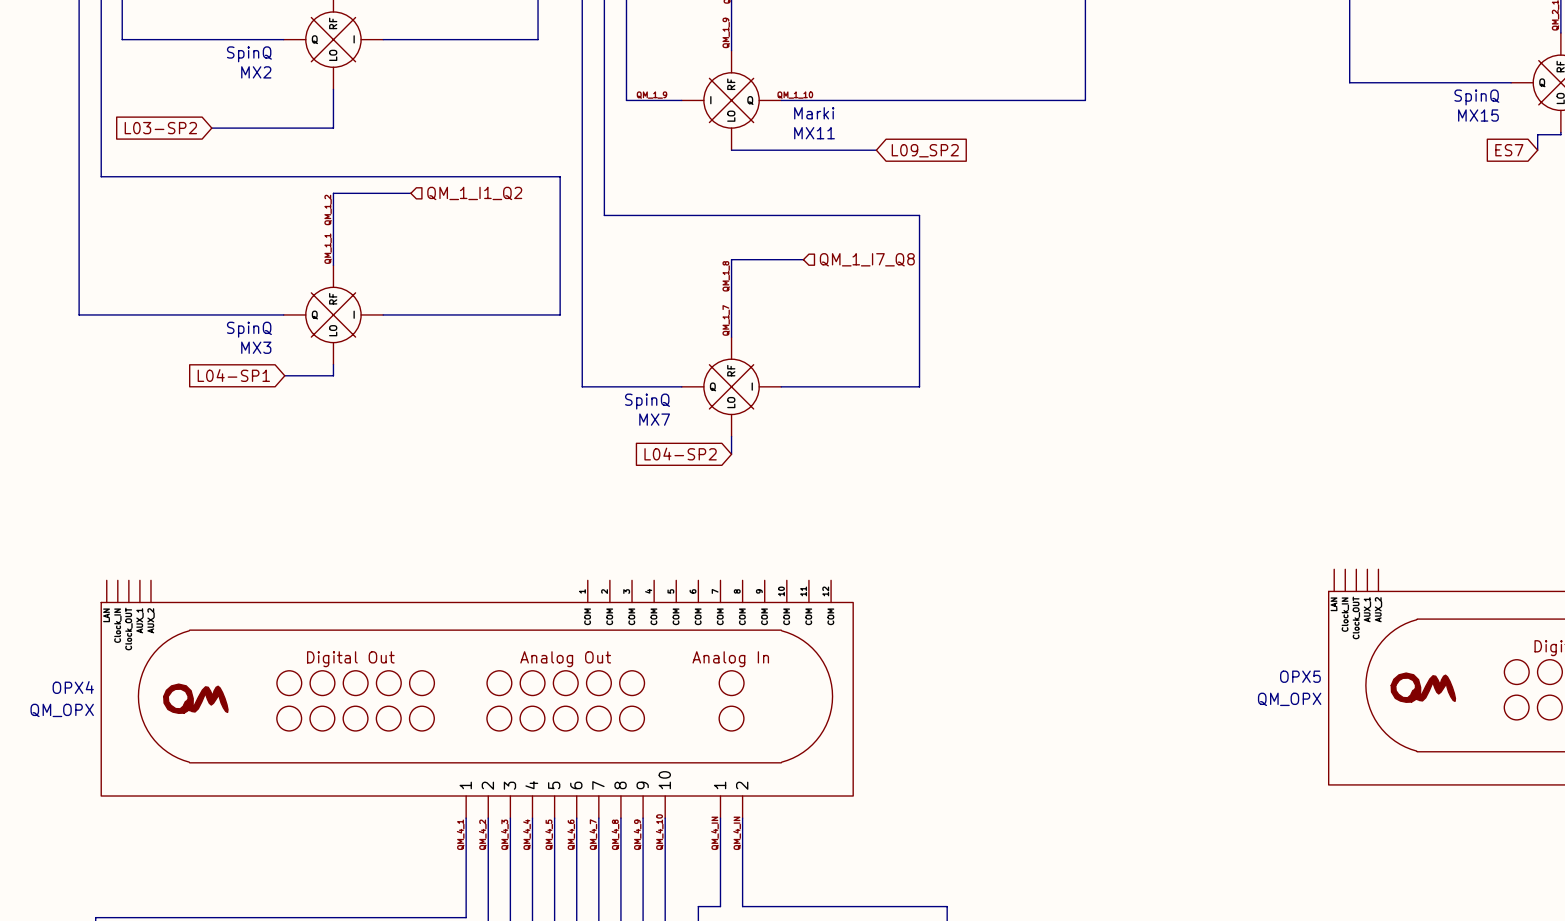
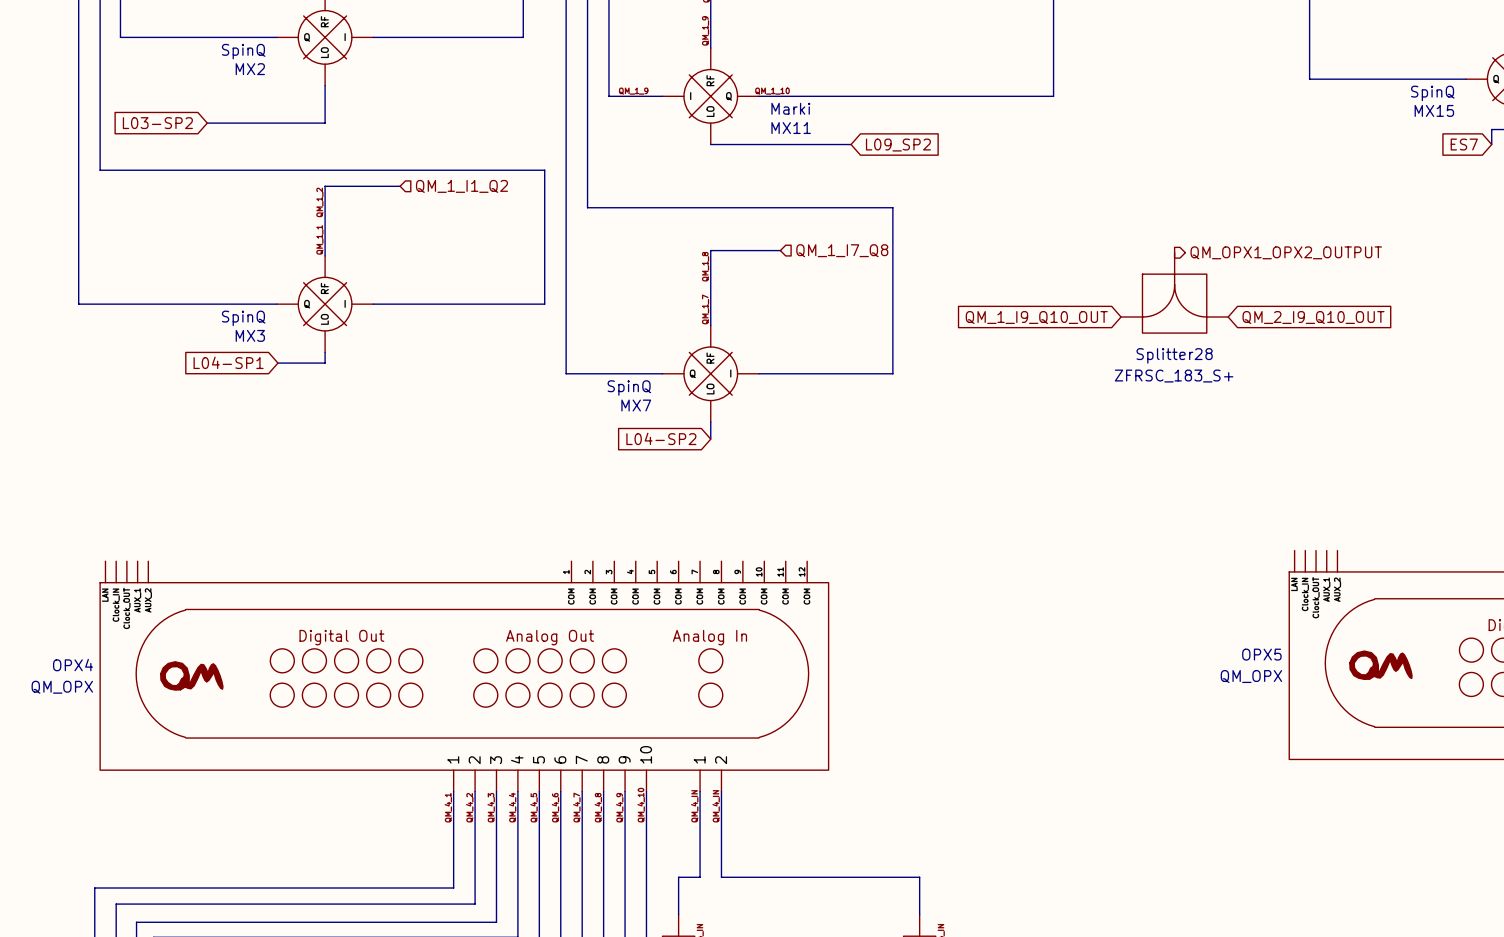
hierarchical label: none -> QM_OPX1_OPX2_OUTPUT (1286, 252)
Splitter28: none -> ZFRSC_183_S+ (1174, 292)
global label: none -> QM_1_I9_Q10_OUT (1036, 317)
global label: none -> QM_2_I9_Q10_OUT (1313, 317)

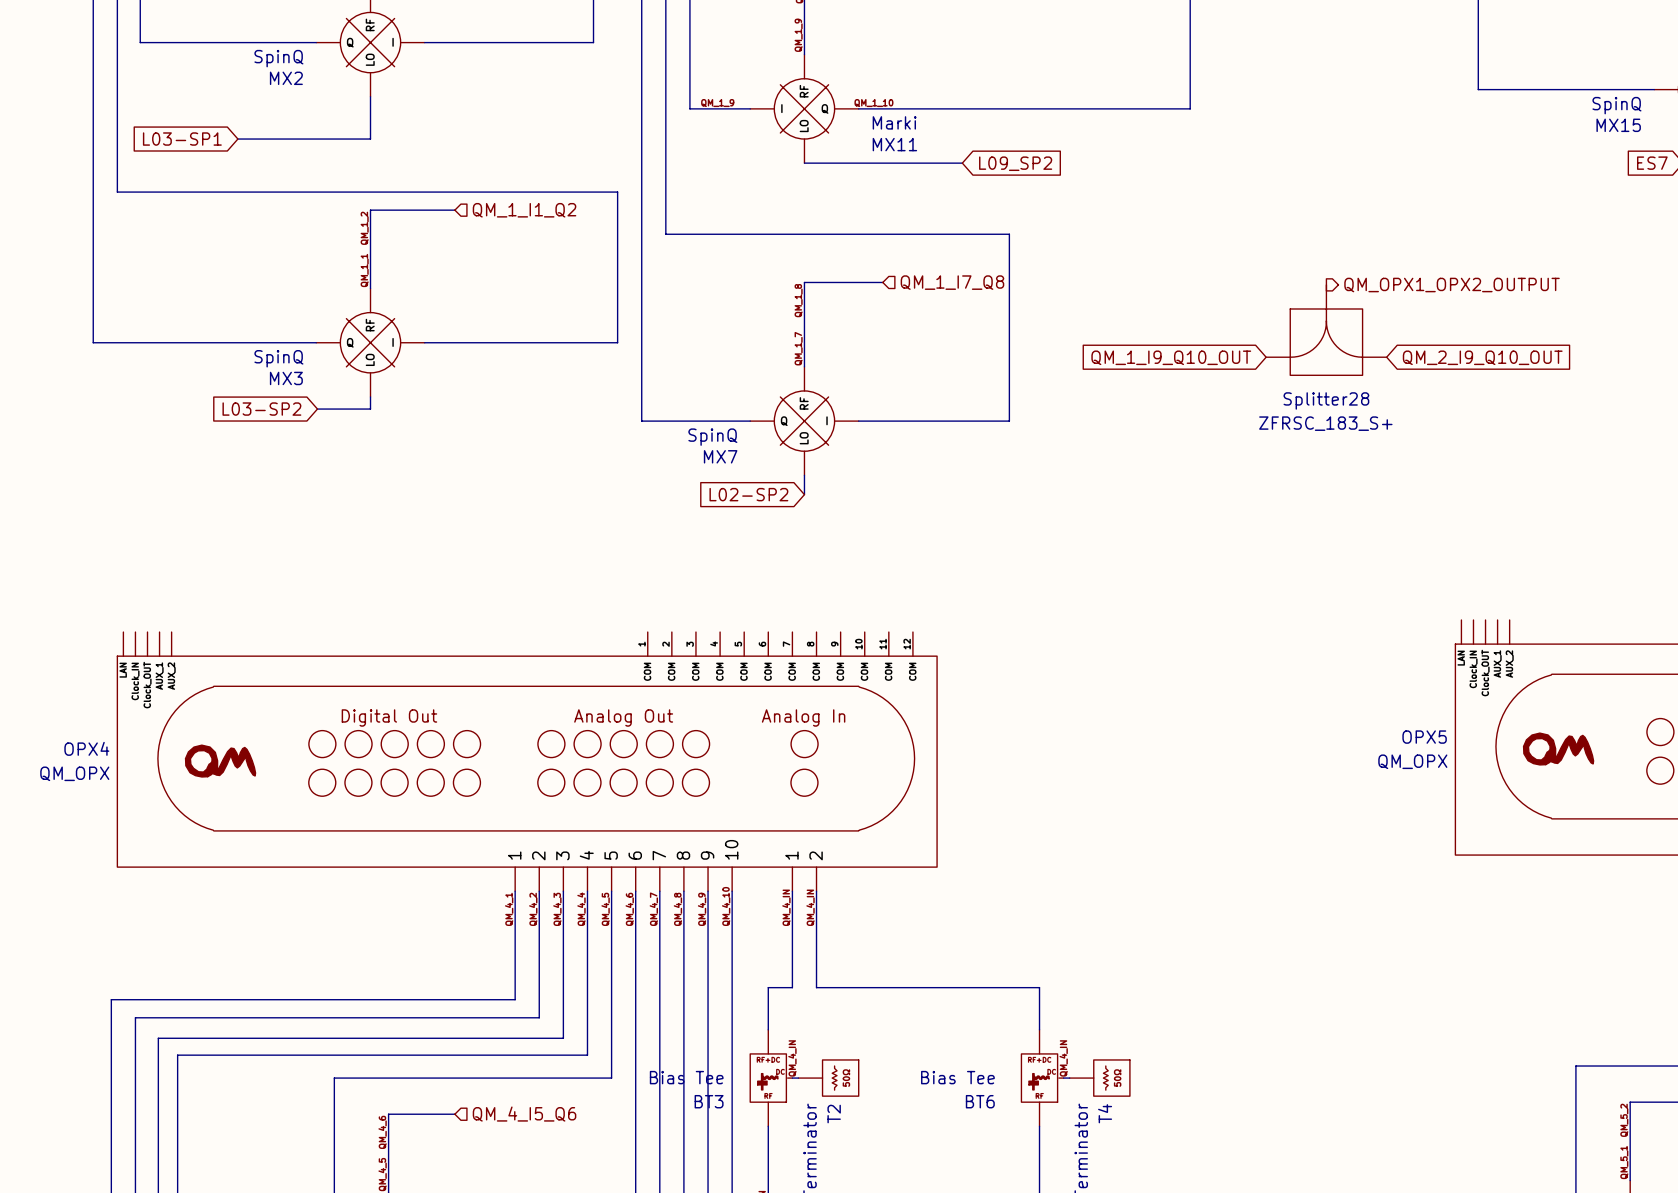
global label: L03-SP2 (157, 123) -> L03-SP1 (182, 139)
global label: L04-SP1 (228, 362) -> L03-SP2 (261, 409)
global label: L04-SP2 (661, 438) -> L02-SP2 (748, 494)

